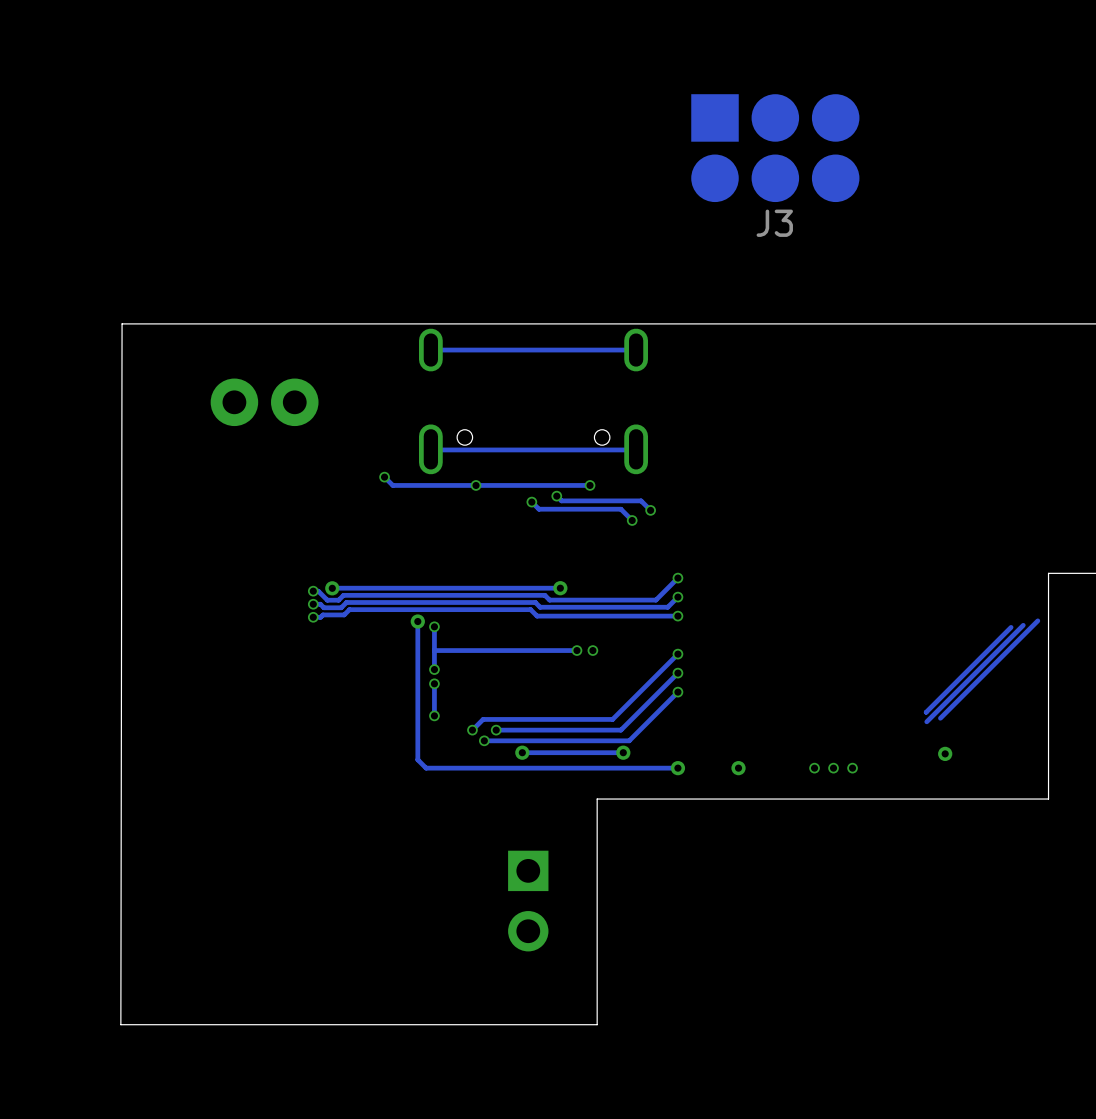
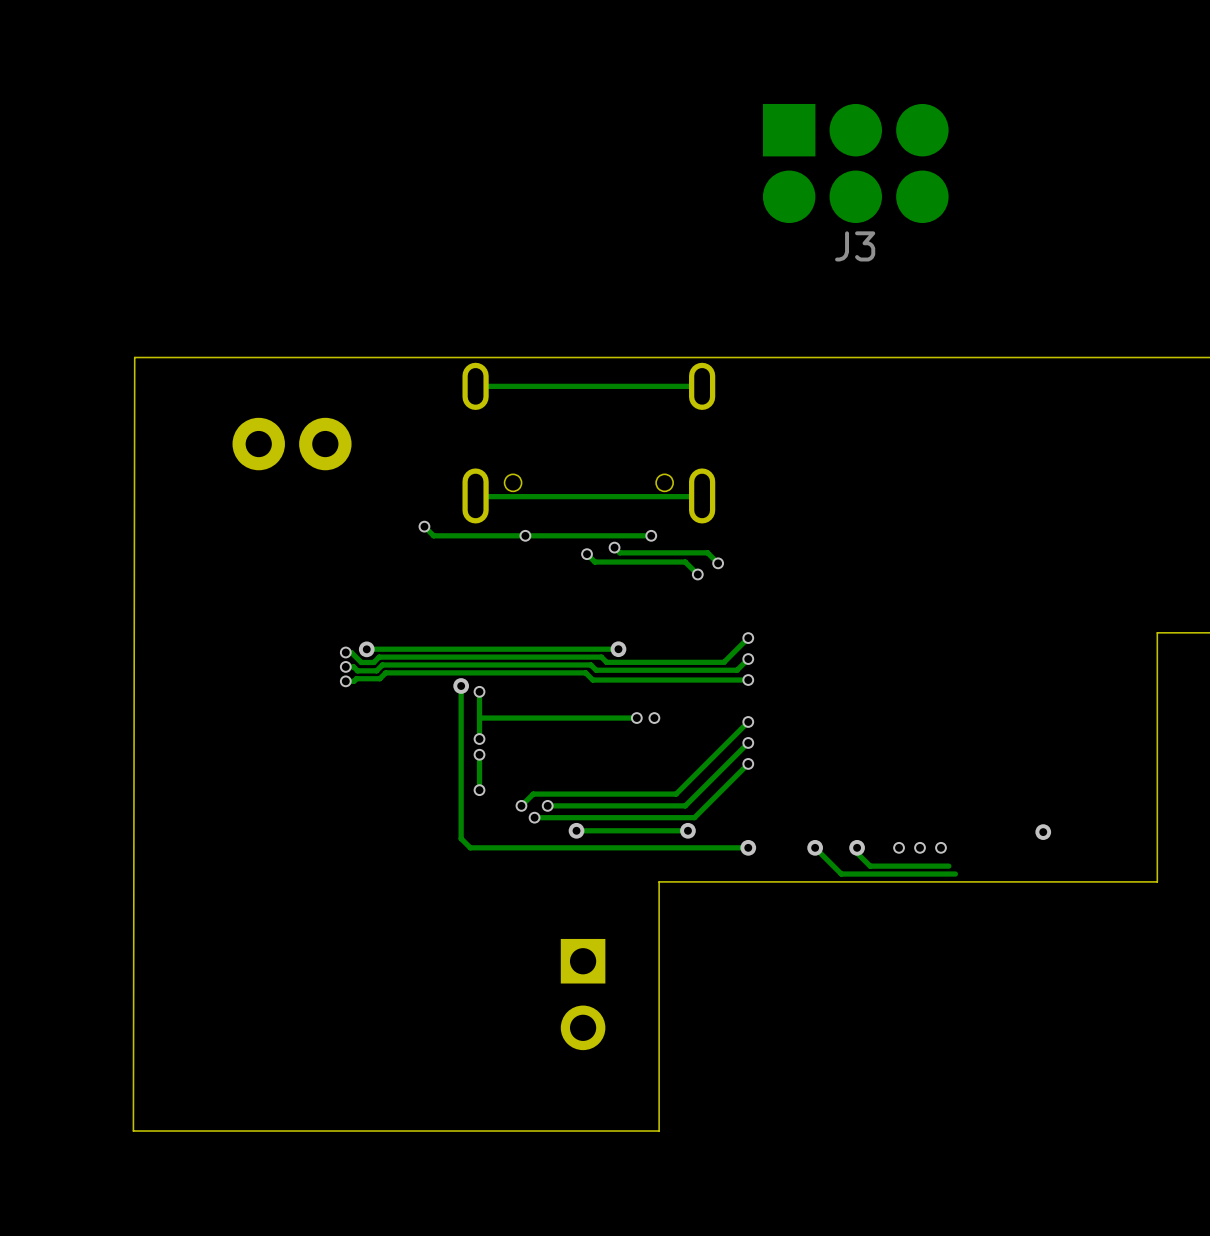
track: (1037, 620) (940, 718) -> none
track: (1023, 625) (926, 721) -> none
track: (1011, 627) (926, 712) -> none
track: none -> (815, 847) (841, 874) (955, 874)
track: none -> (857, 847) (857, 853) (870, 866) (948, 866)
via: none -> (857, 847)

